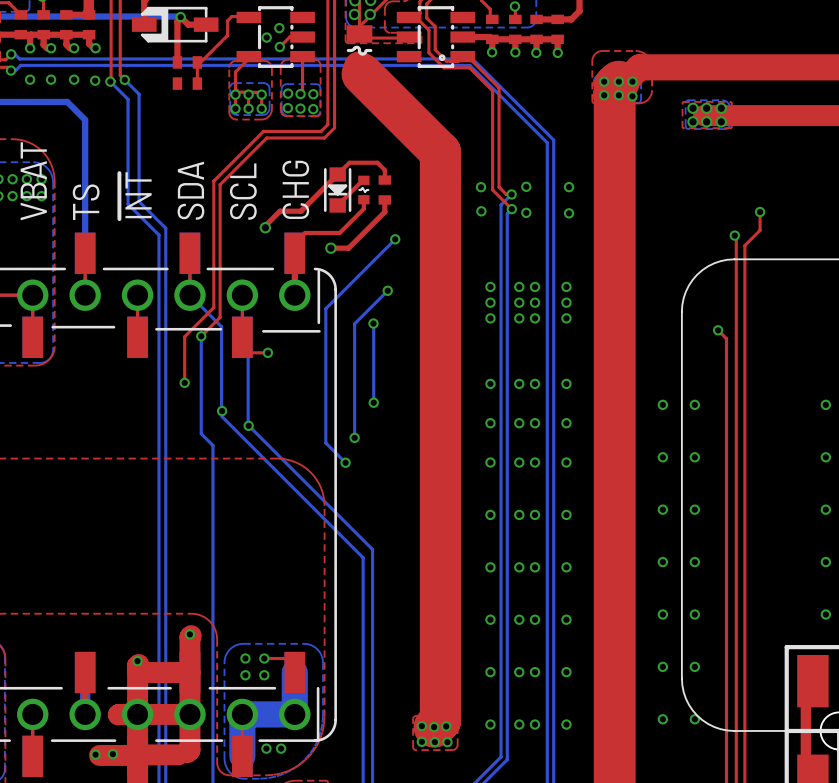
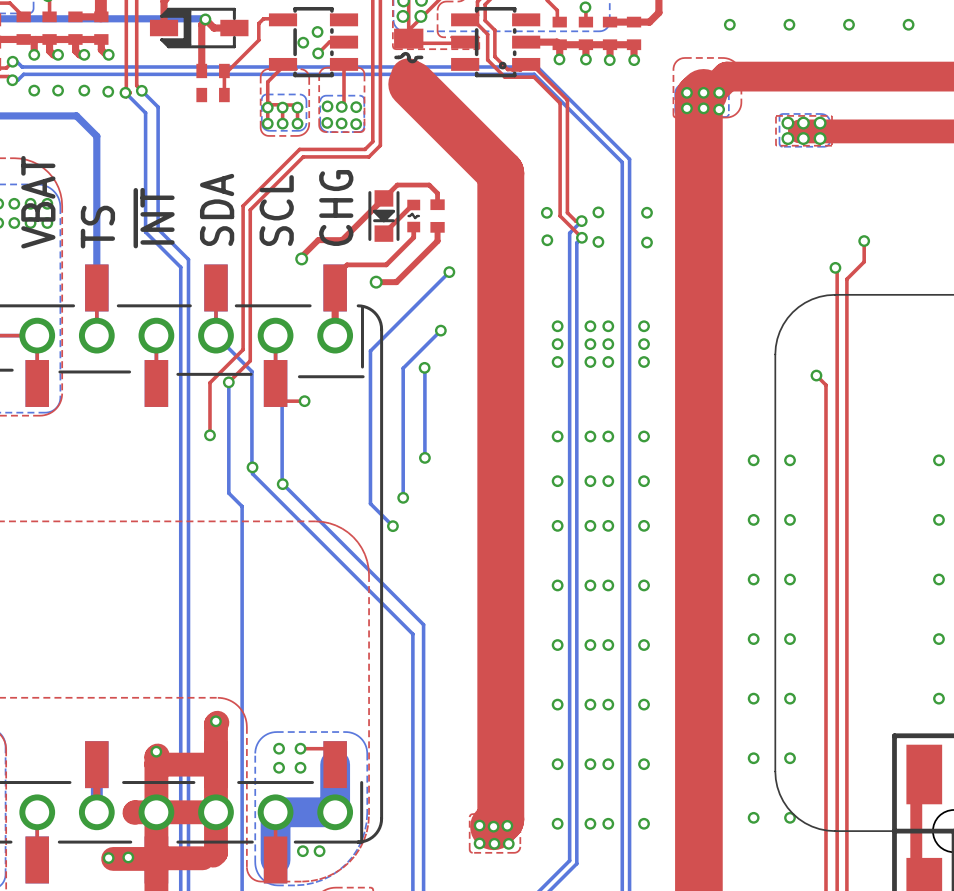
via: none -> (729, 24)
via: none -> (789, 24)
via: none -> (848, 24)
via: none -> (908, 24)

